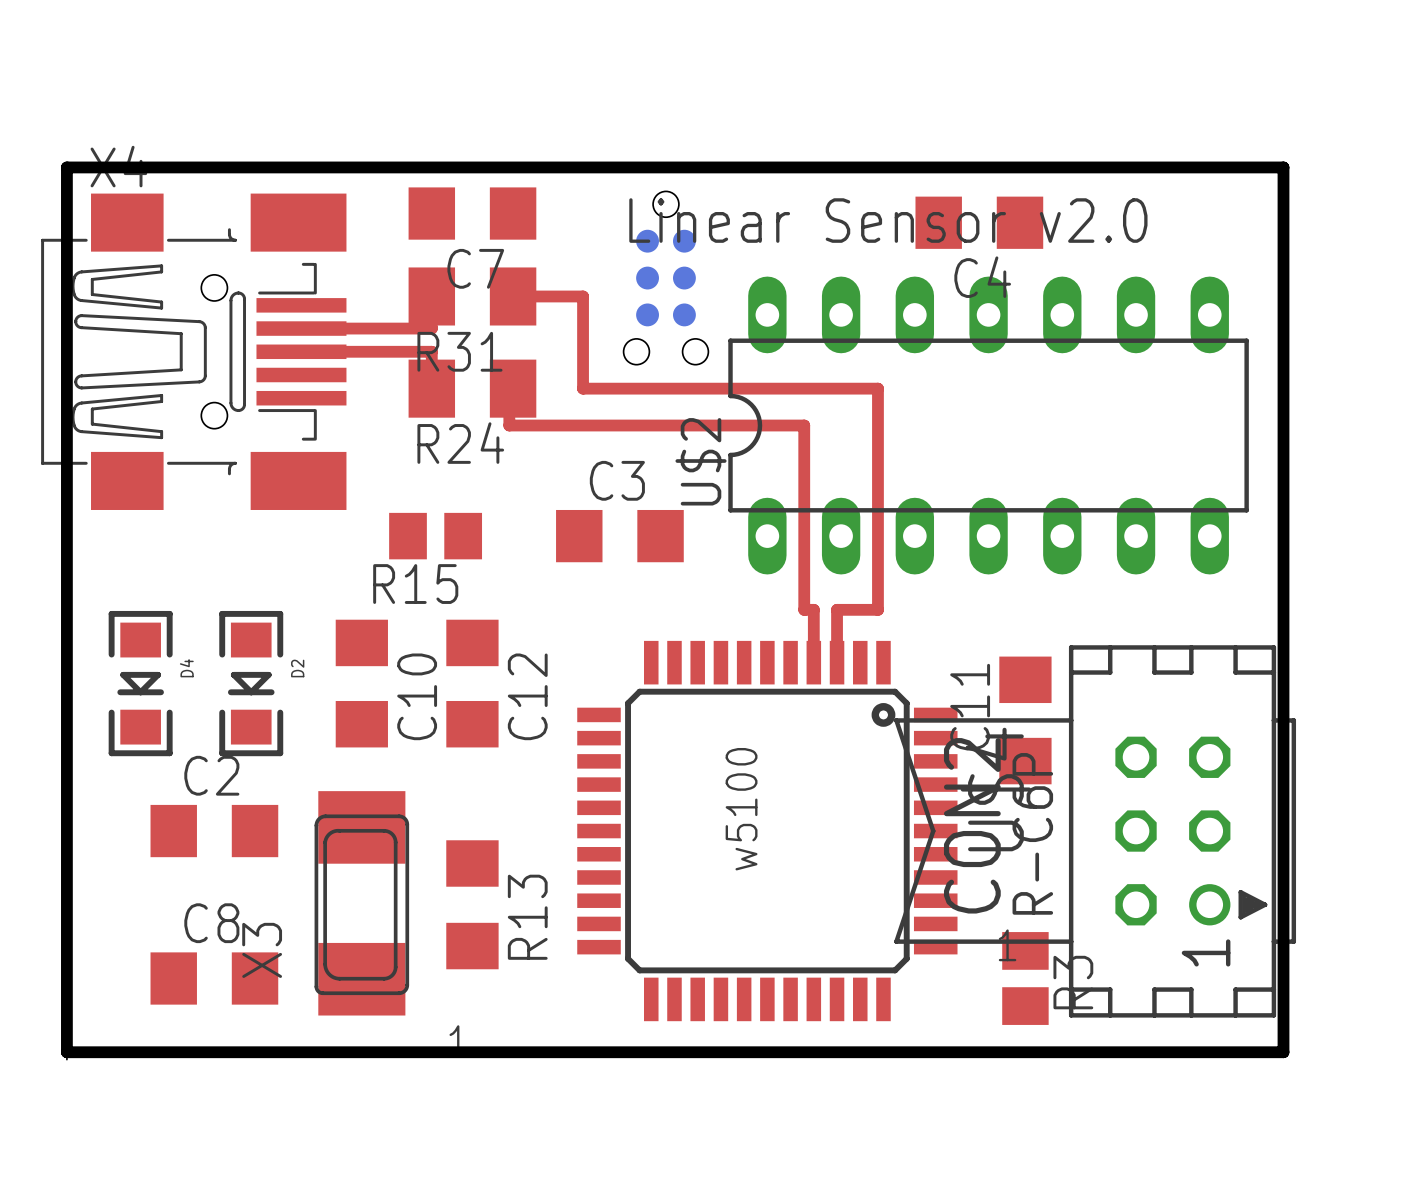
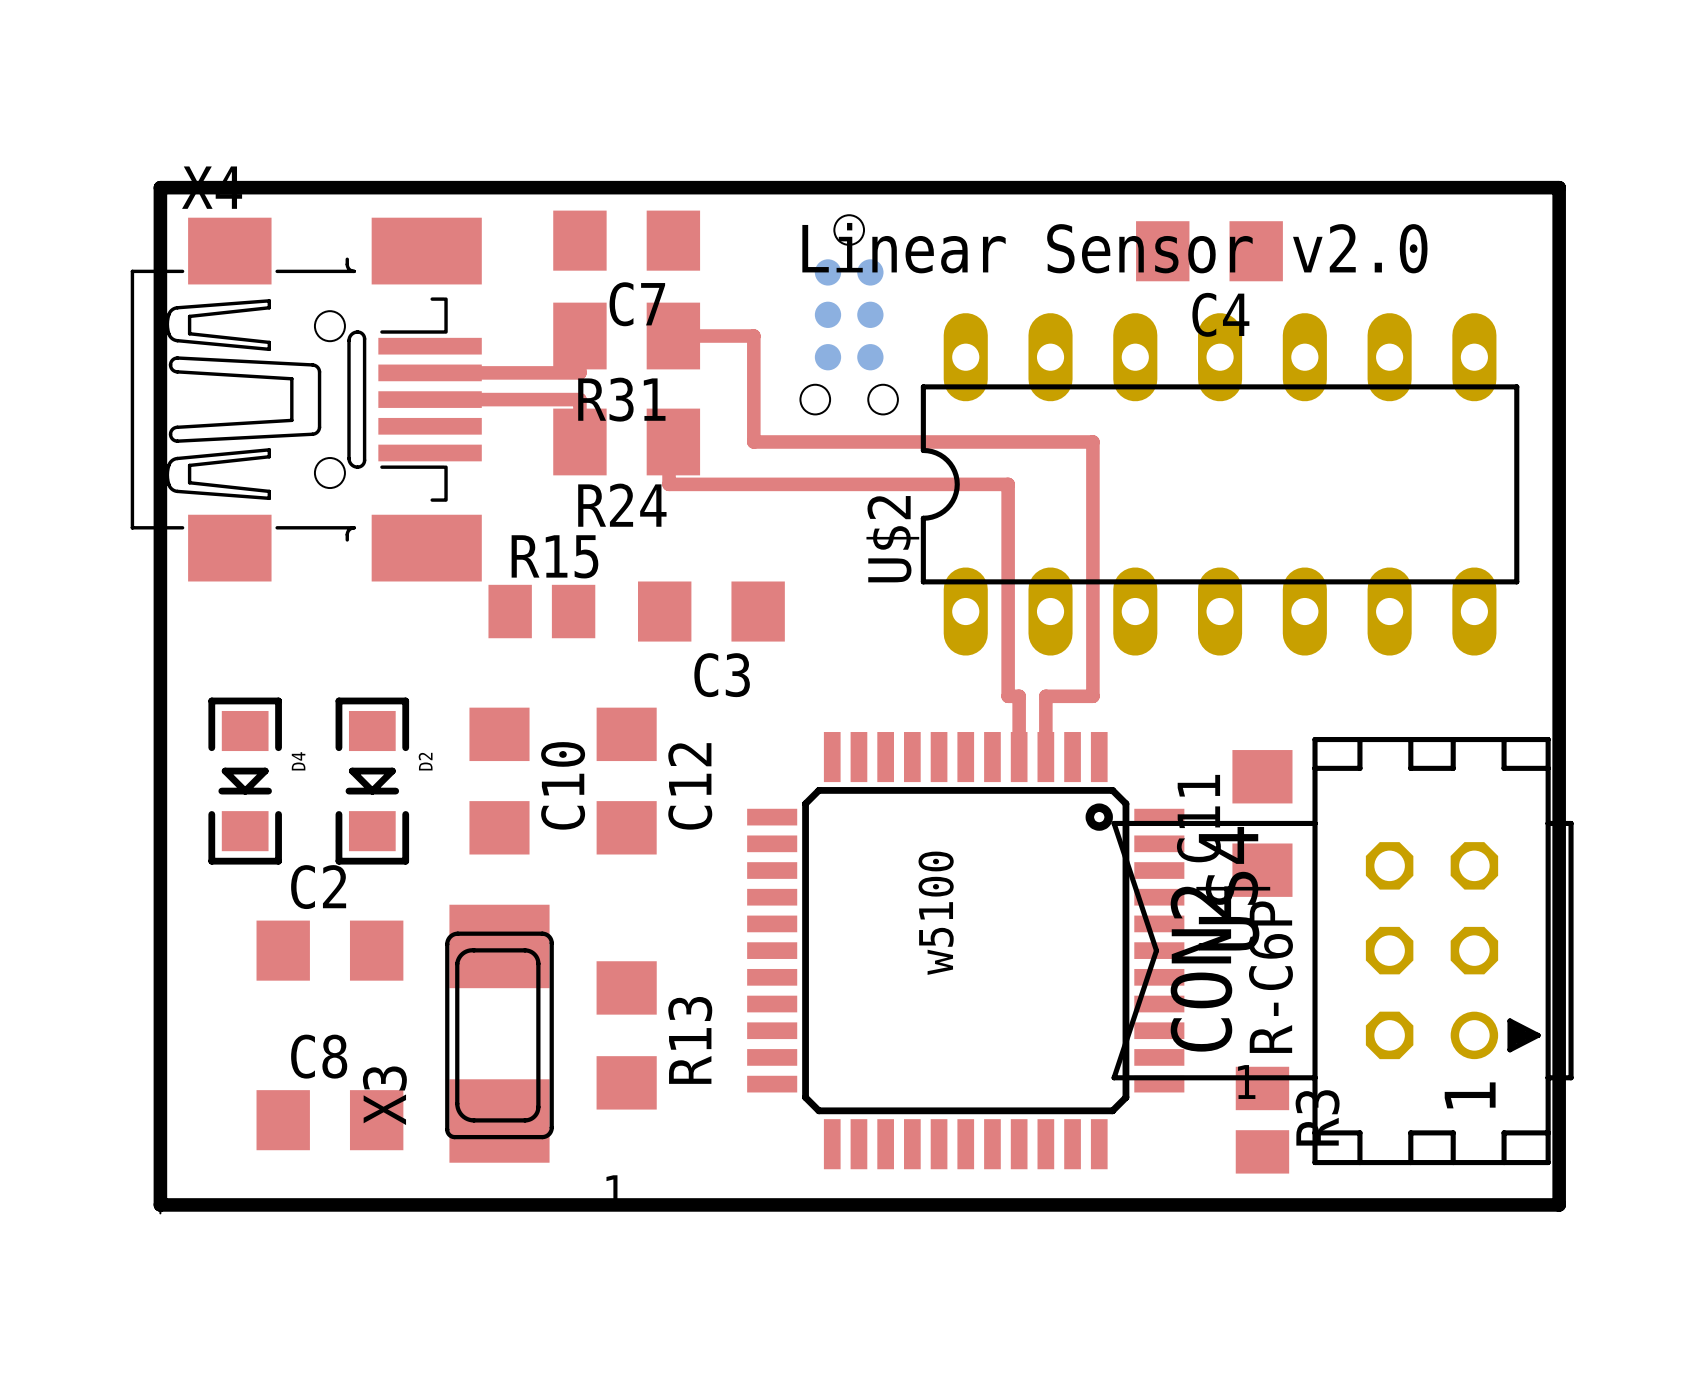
C3 name position: C3 (617, 480) -> C3 (722, 675)
R15 position: (435, 536) -> (541, 611)
C3 position: (619, 536) -> (711, 611)
R15 name position: R15 (415, 584) -> R15 (554, 556)

